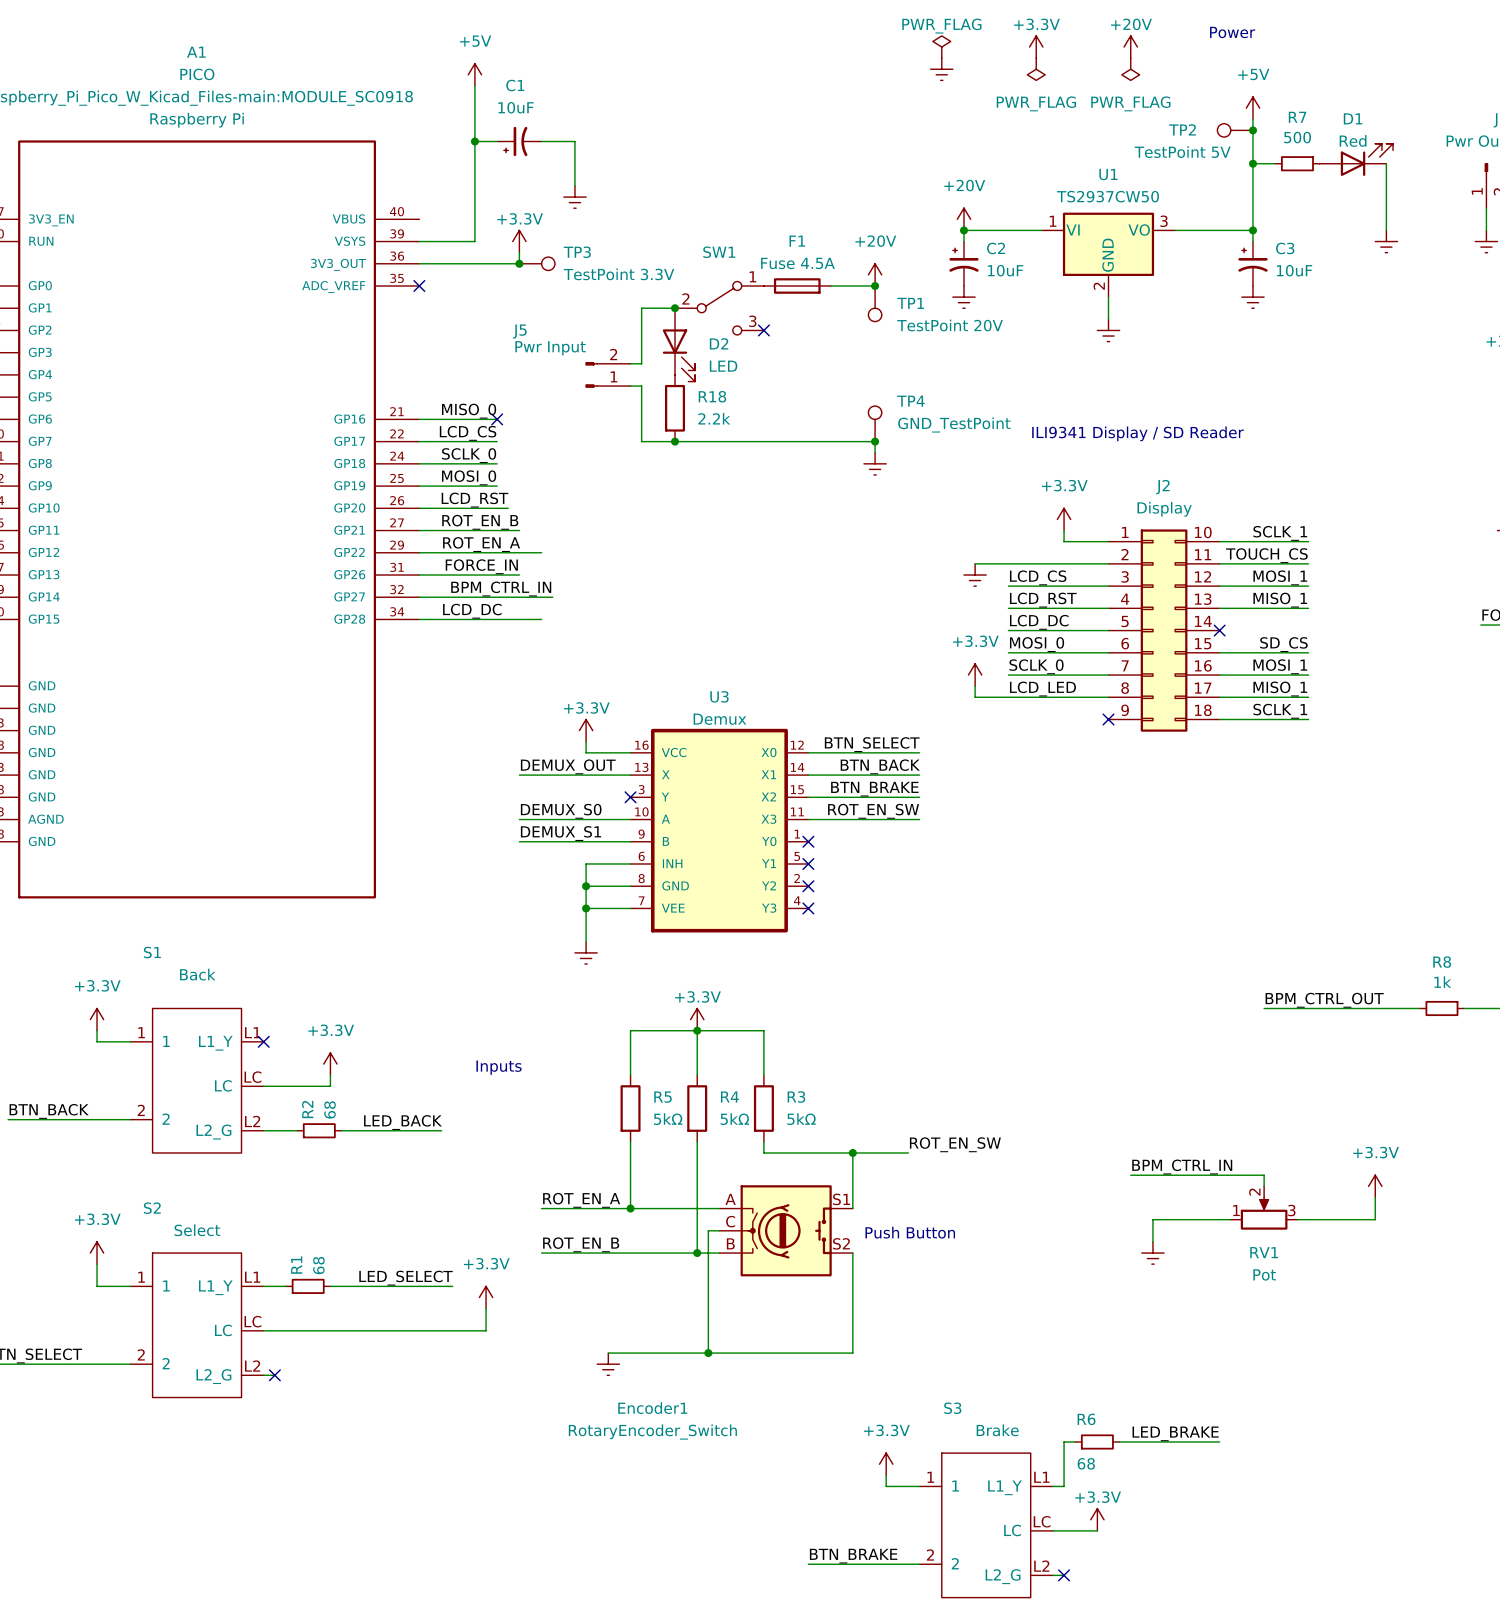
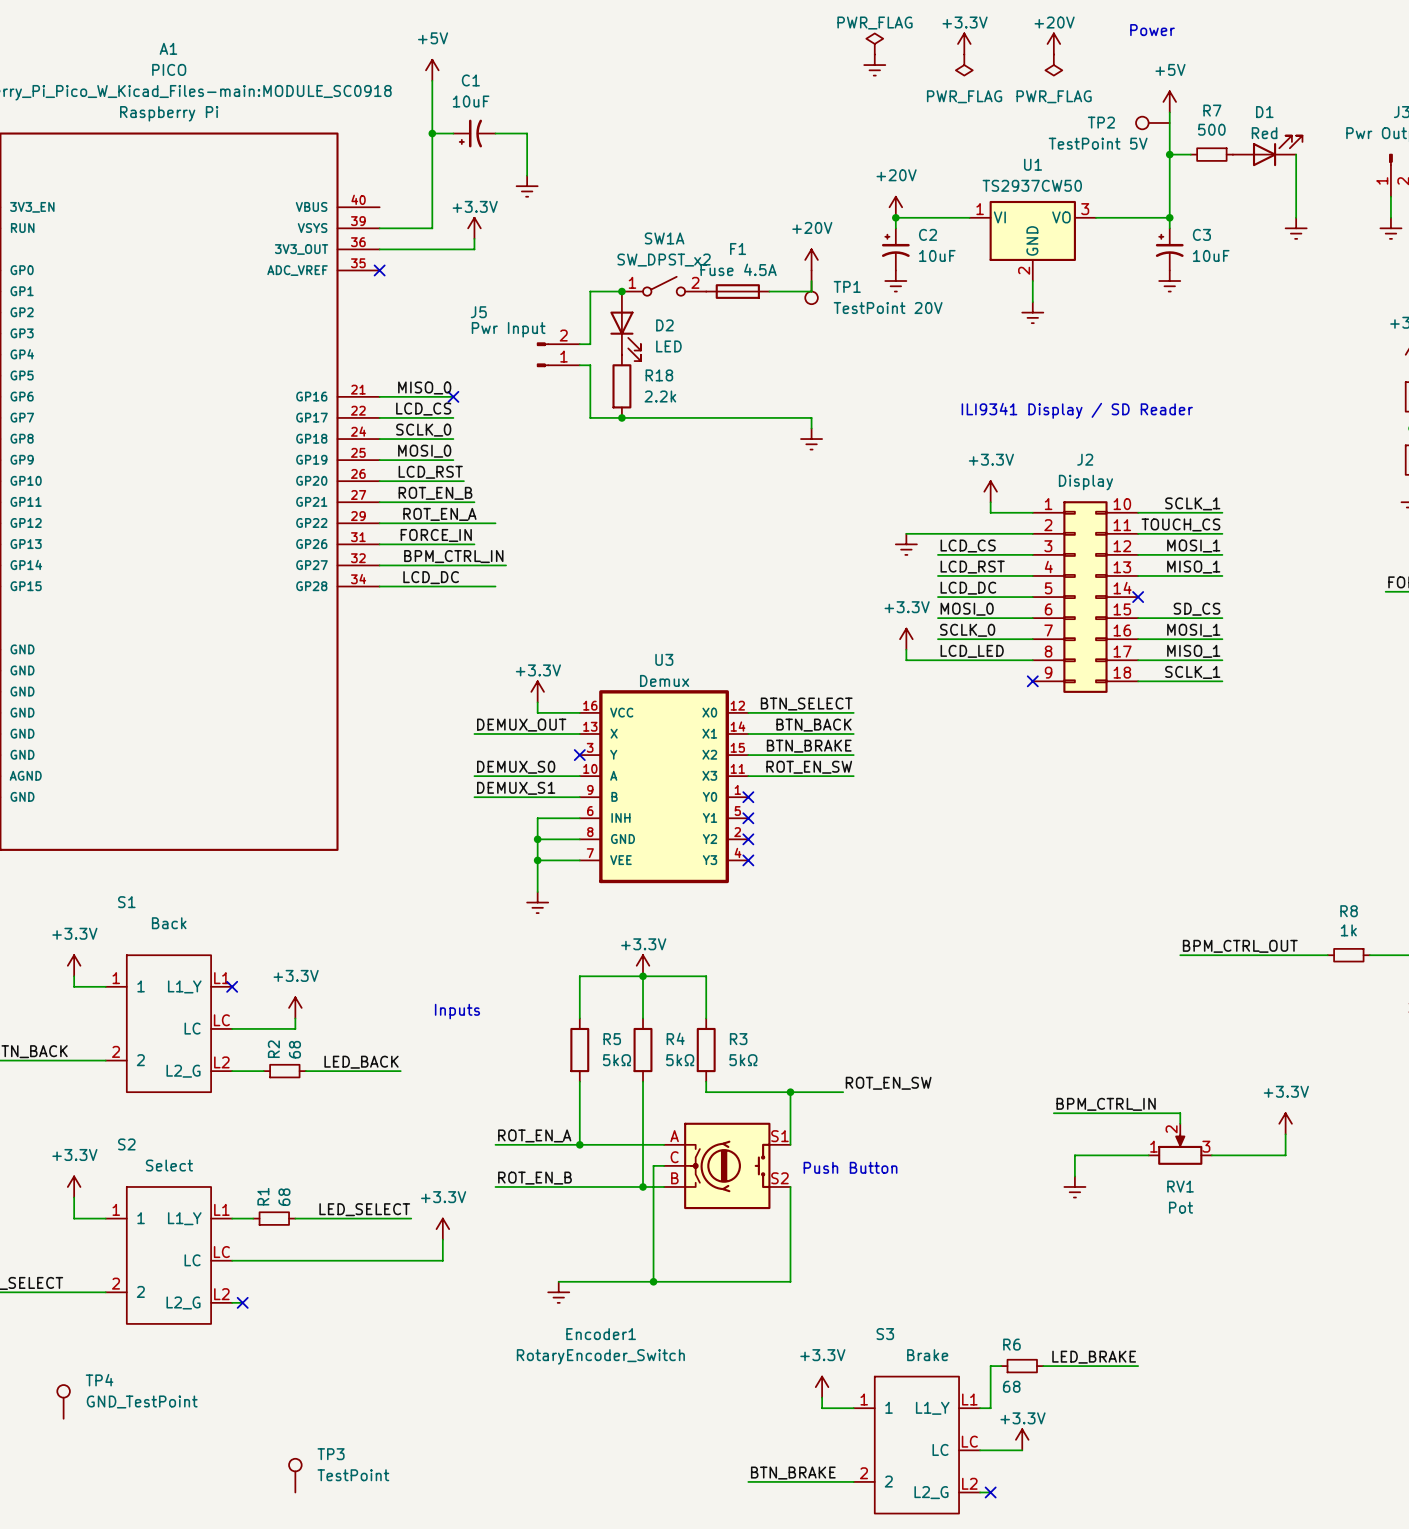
junction: (1252, 130) -> none
junction: (519, 263) -> none
TP3 position: (537, 263) -> (295, 1475)
TP3 rotation: 0° (548, 263) -> 90° counterclockwise (295, 1465)
TP3 value: TestPoint 3.3V (619, 274) -> TestPoint (353, 1475)
F1 position: (797, 286) -> (737, 291)
wire: (830, 286) (875, 286) -> none
junction: (875, 286) -> none
wire: none -> (811, 281) (811, 291) (769, 291)
SW1A: none -> SW_DPST_x2 (664, 286)
SW1: (719, 308) -> none
no-connect mark: (763, 330) -> none
TP4 position: (875, 423) -> (63, 1401)
junction: (875, 441) -> none

